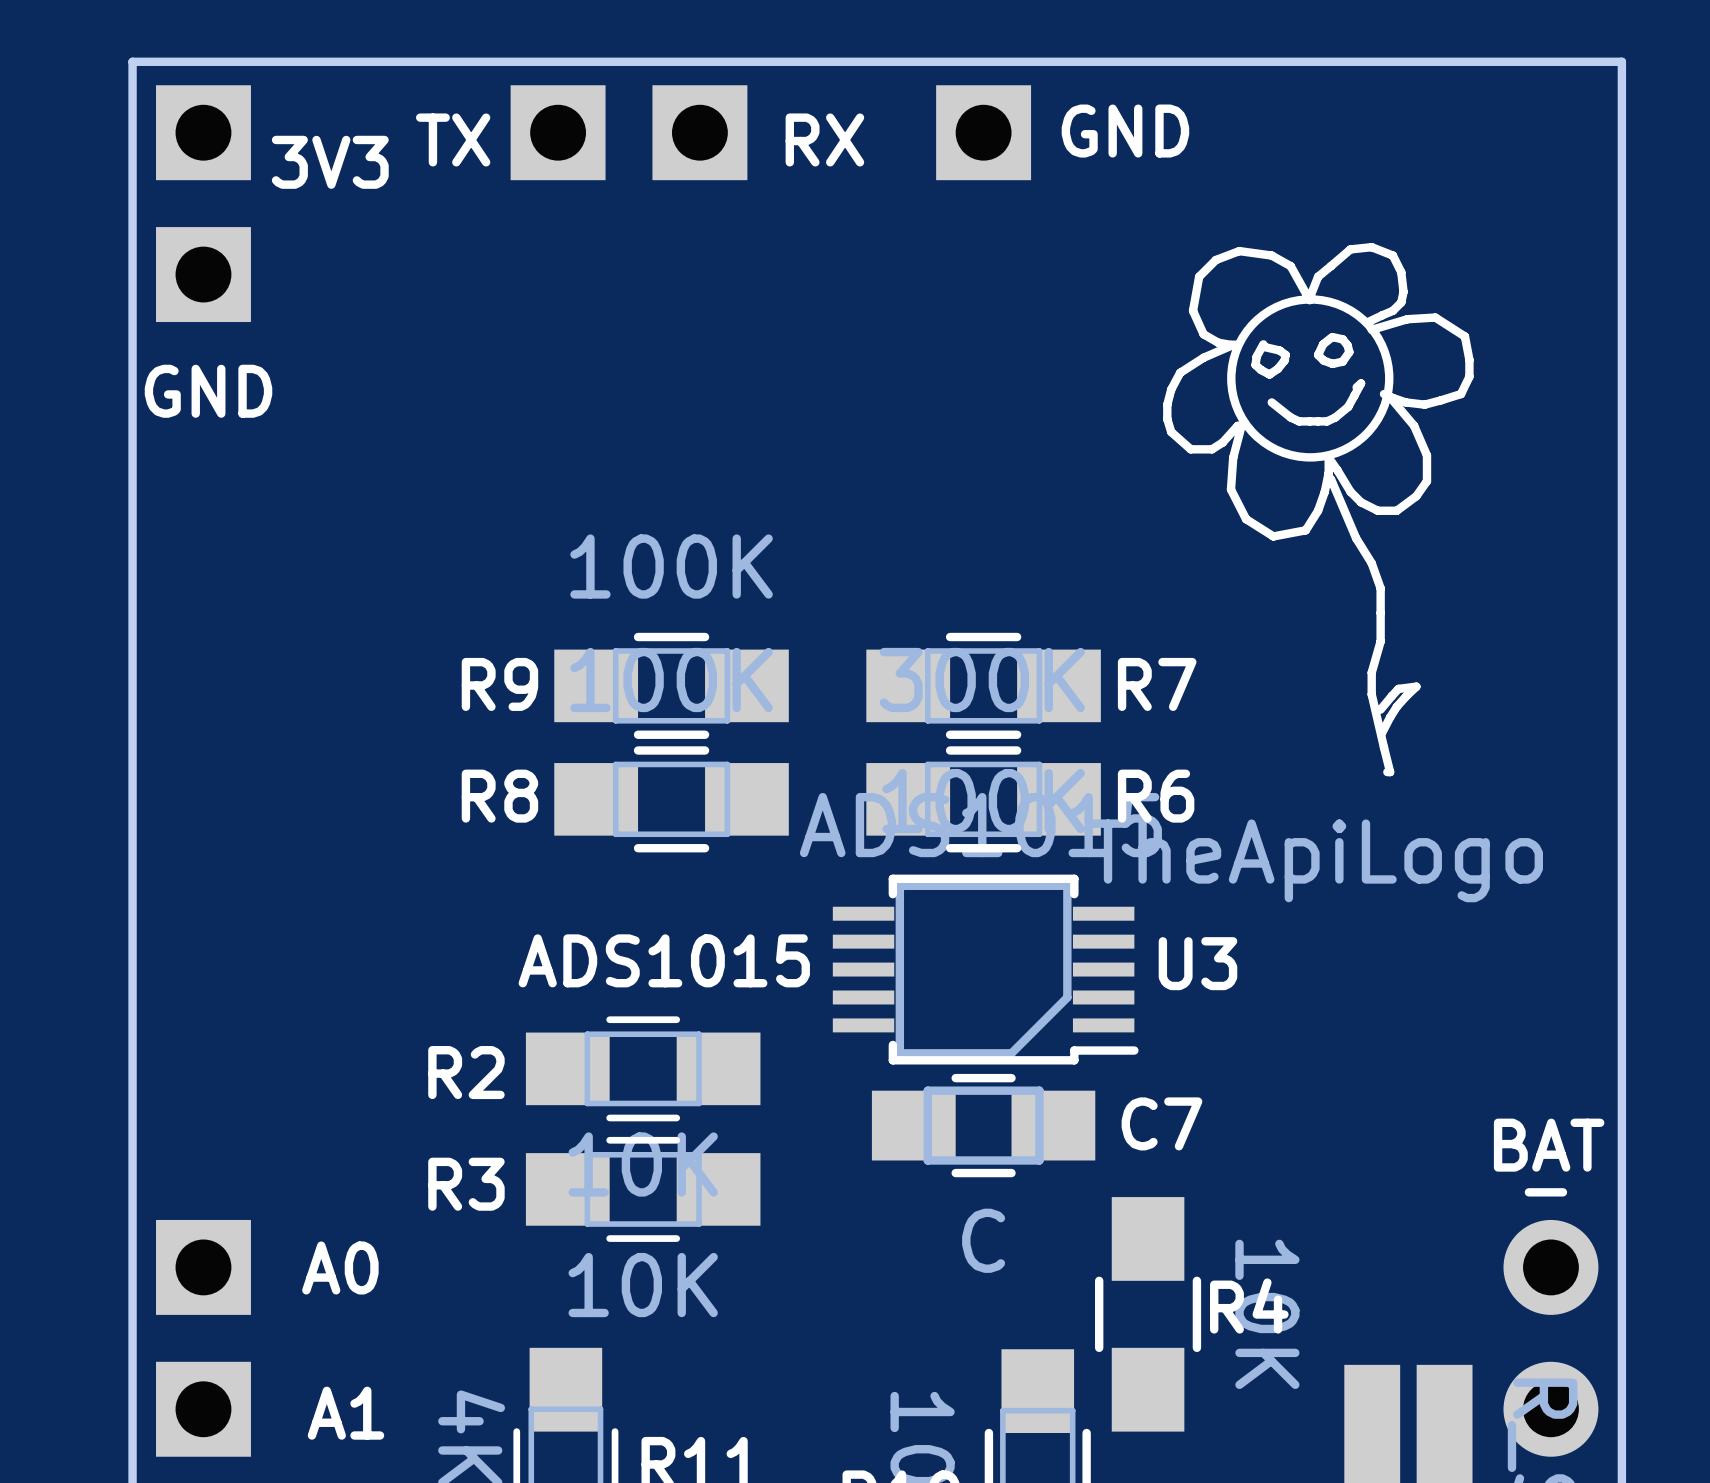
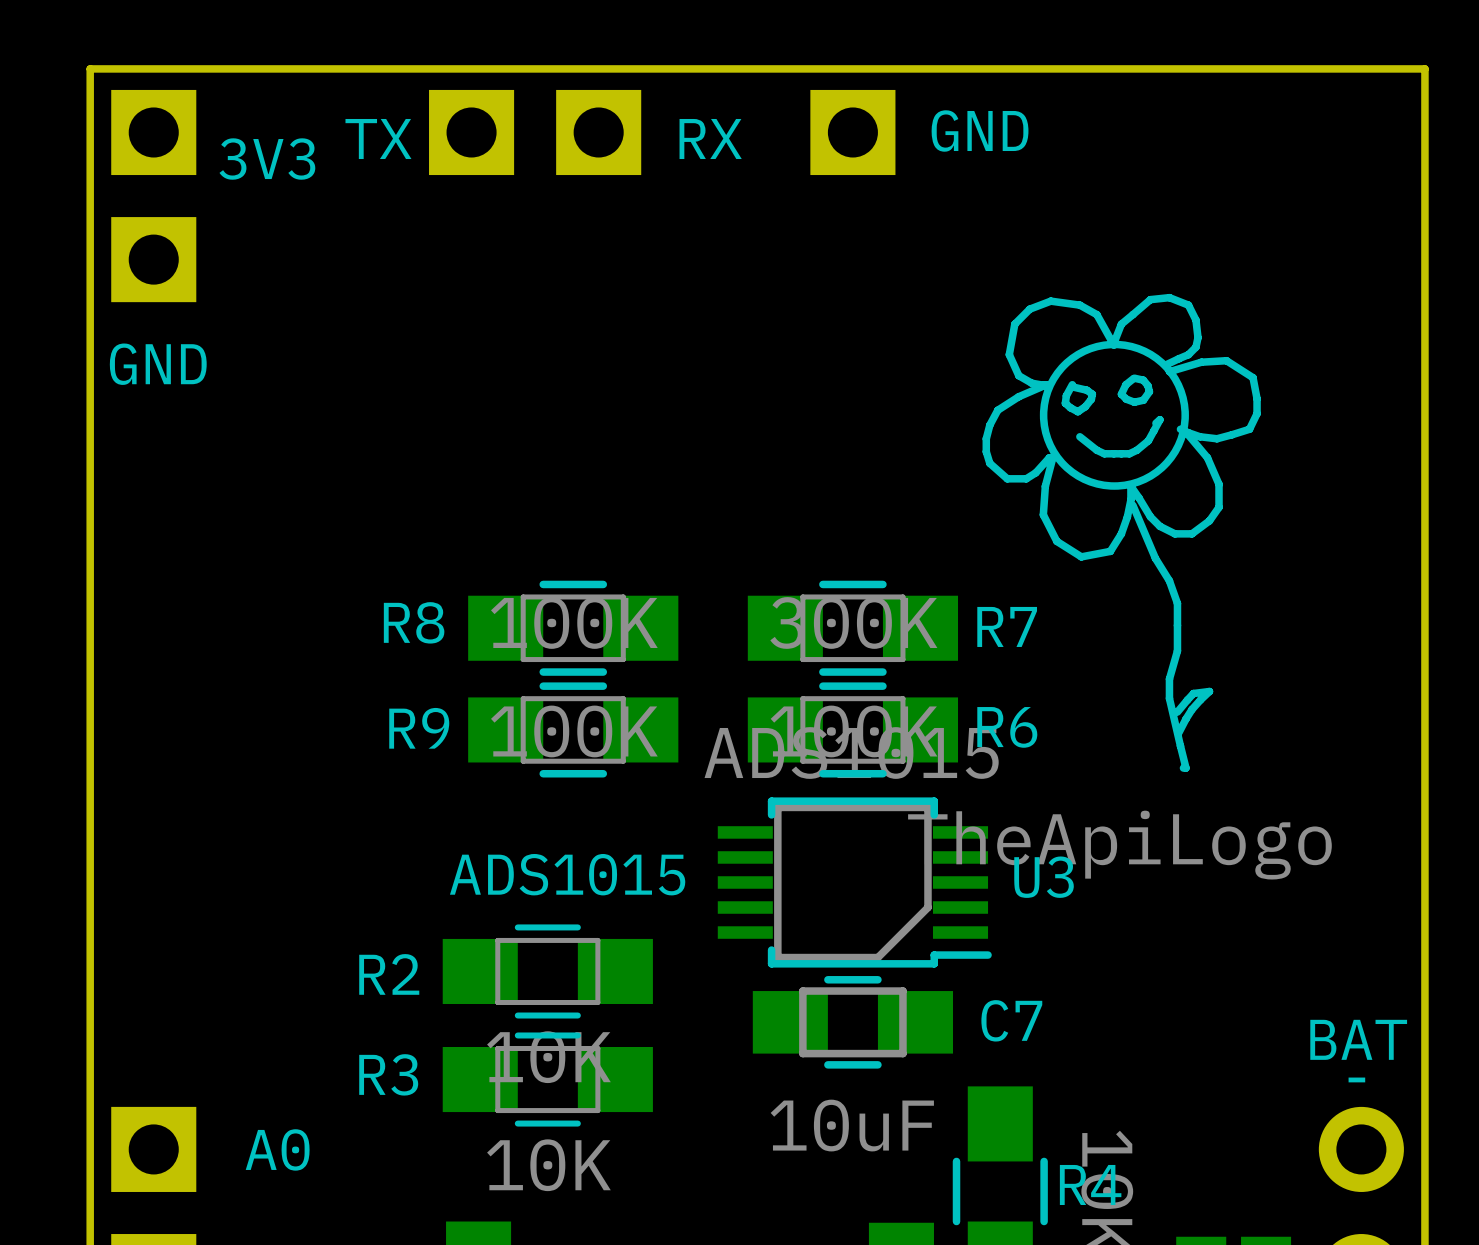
drawing position: (1318, 509) -> (1121, 532)
R9 value position: 100K (671, 566) -> 100K (574, 731)
R9 name: R9 (499, 684) -> R8 (414, 622)
R8 name: R8 (499, 796) -> R9 (419, 728)
C7 value: C (983, 1240) -> 10uF (852, 1125)

